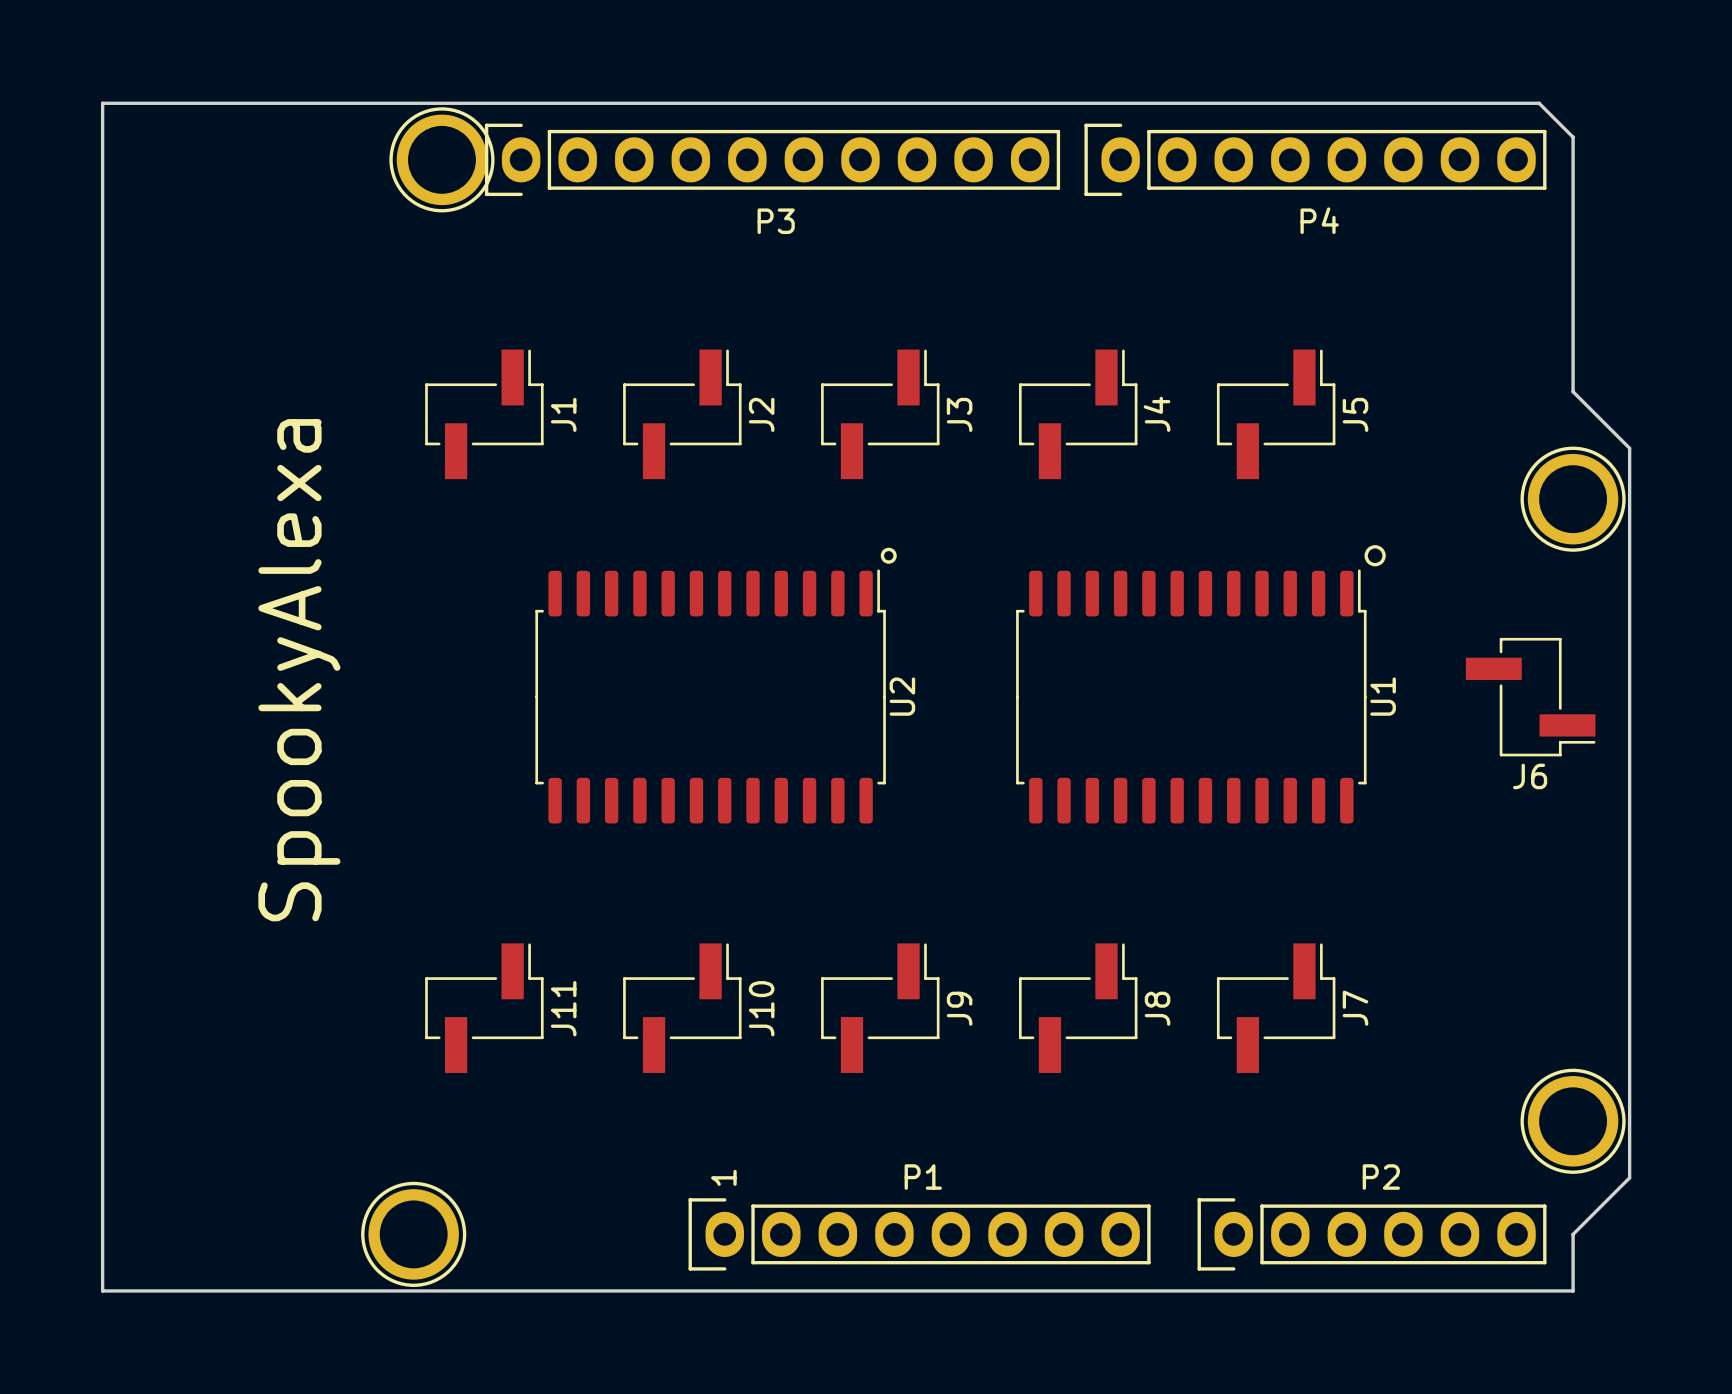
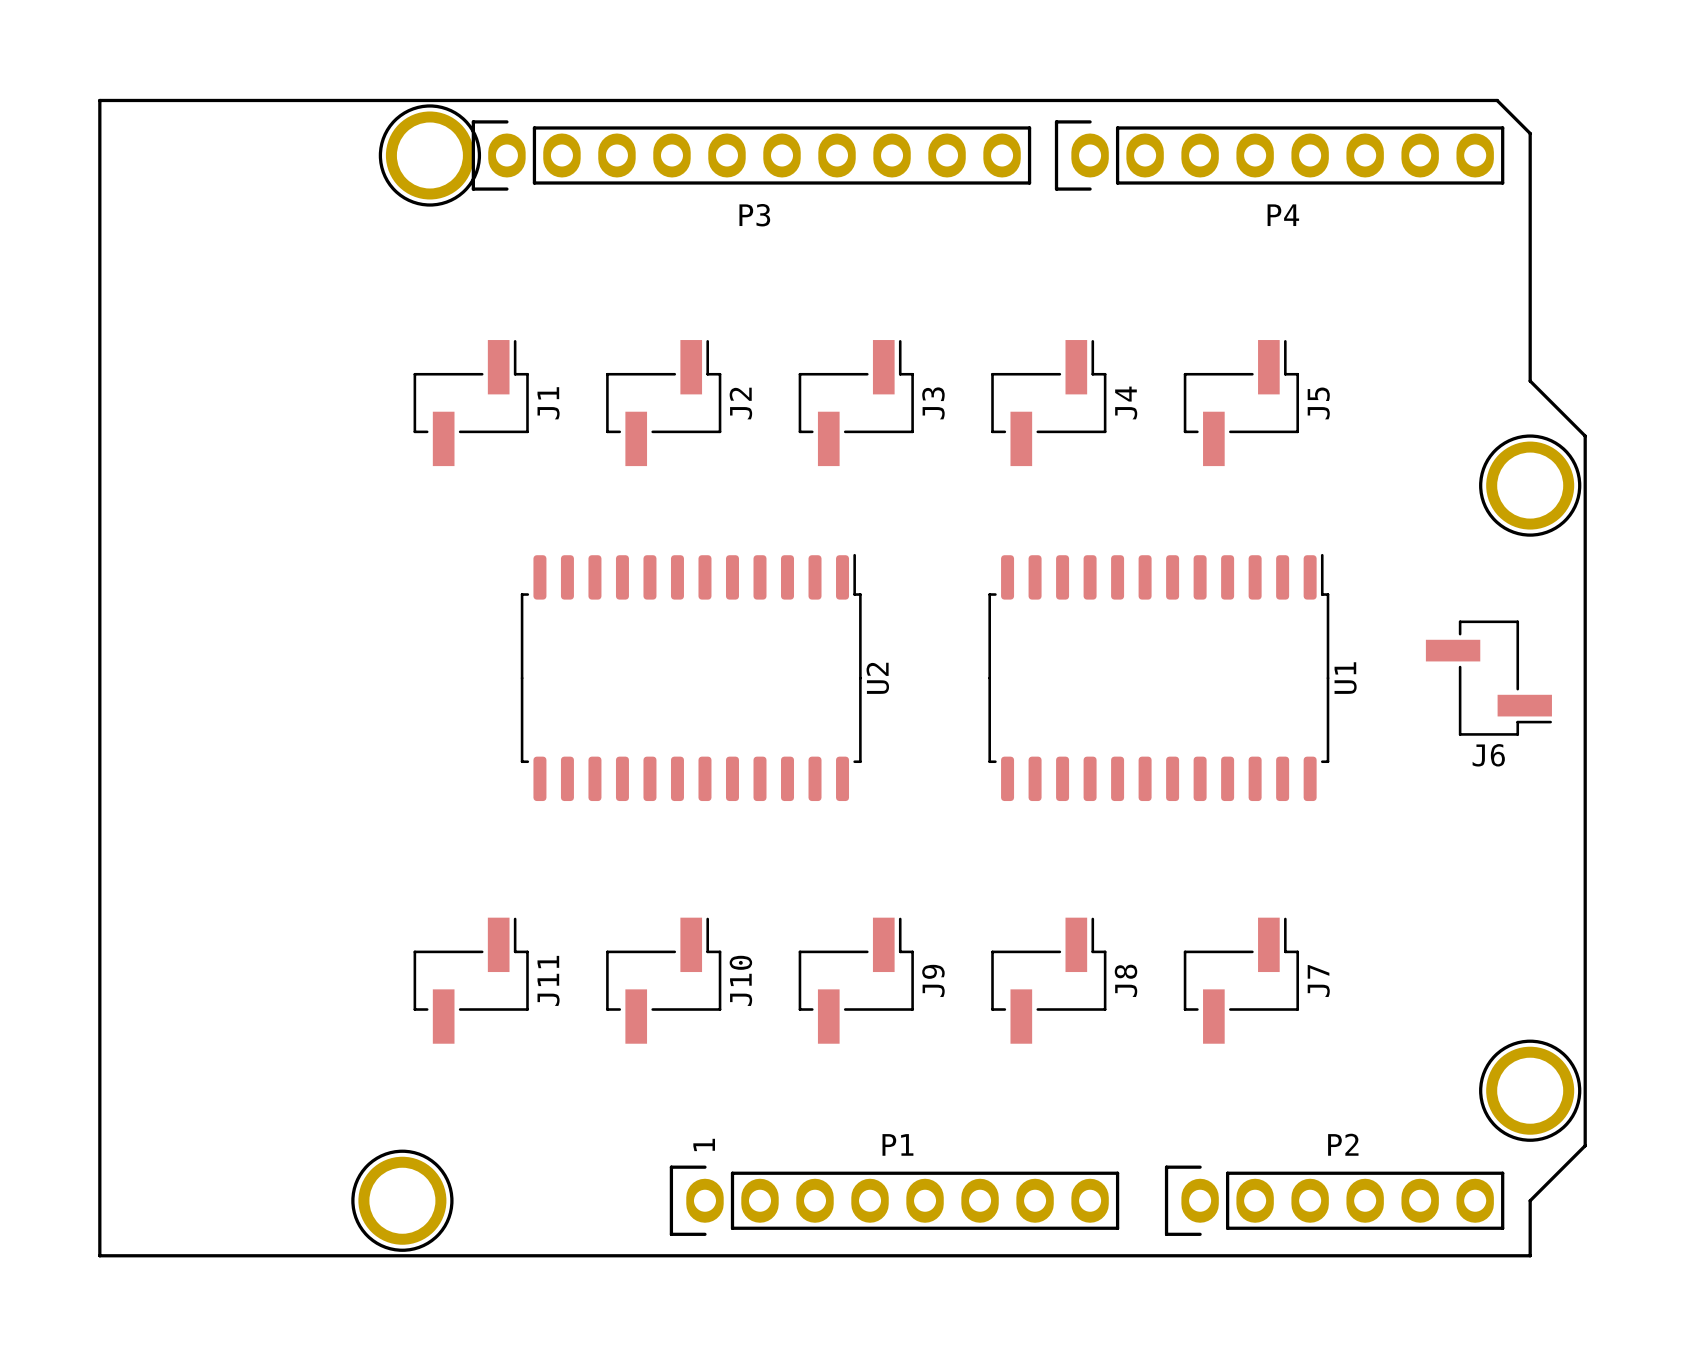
drawing: [1364, 545, 1386, 567] -> none
drawing: [880, 547, 897, 564] -> none
text: SpookyAlexa (299, 670) -> none

